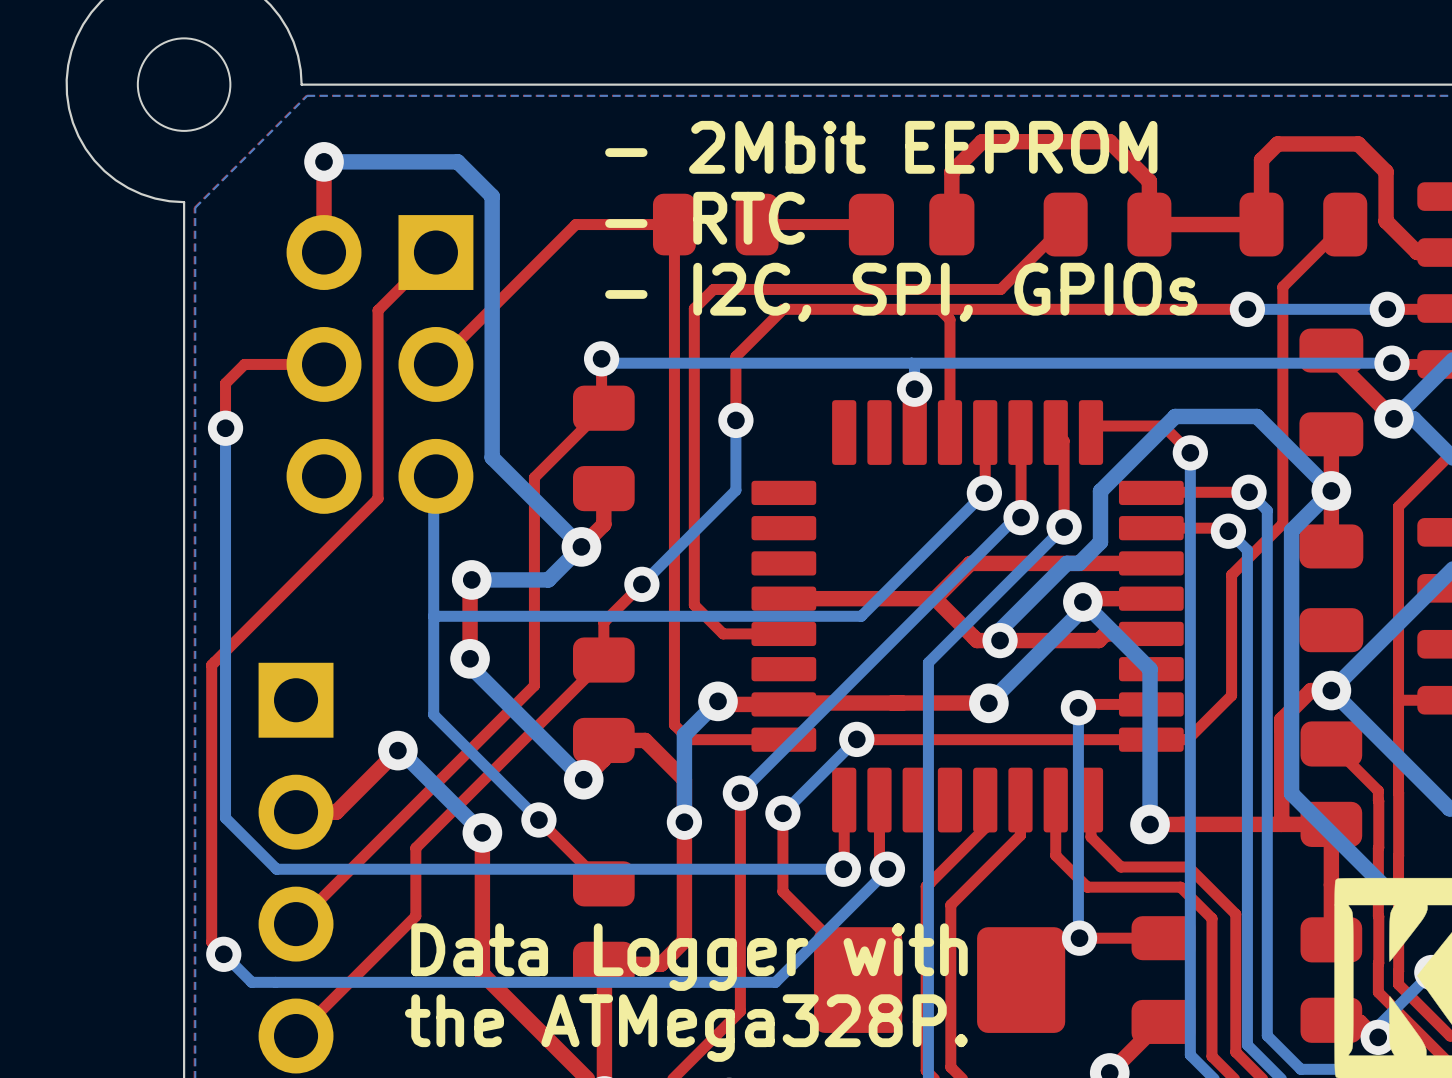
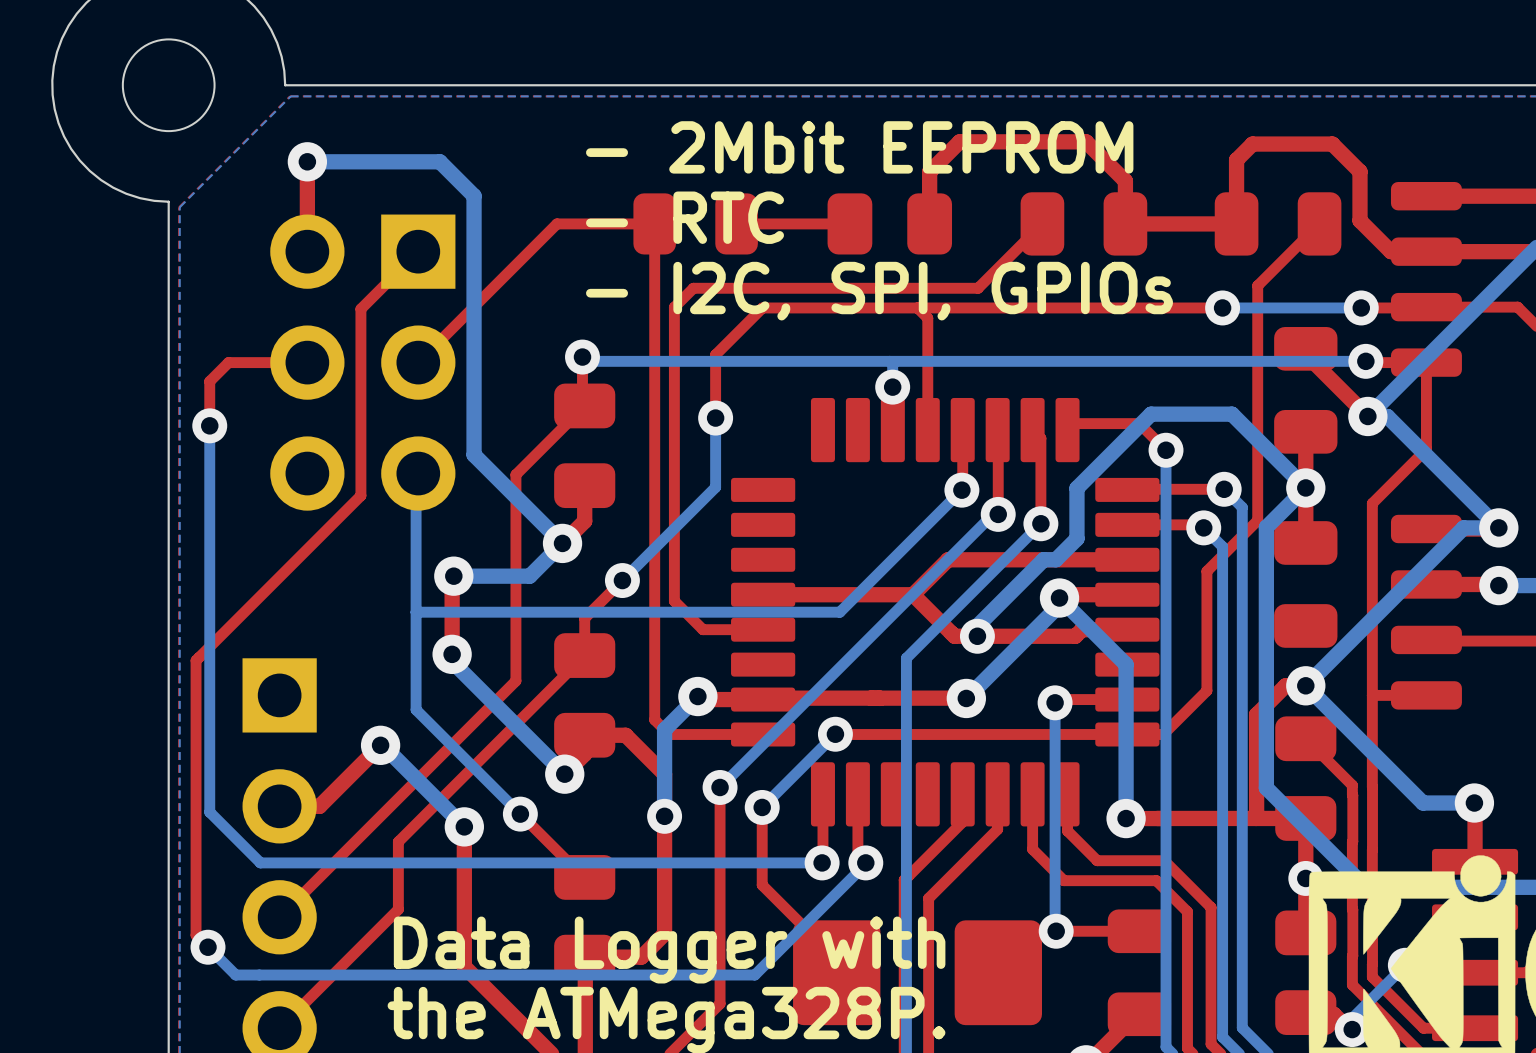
via: none -> (1305, 878)

